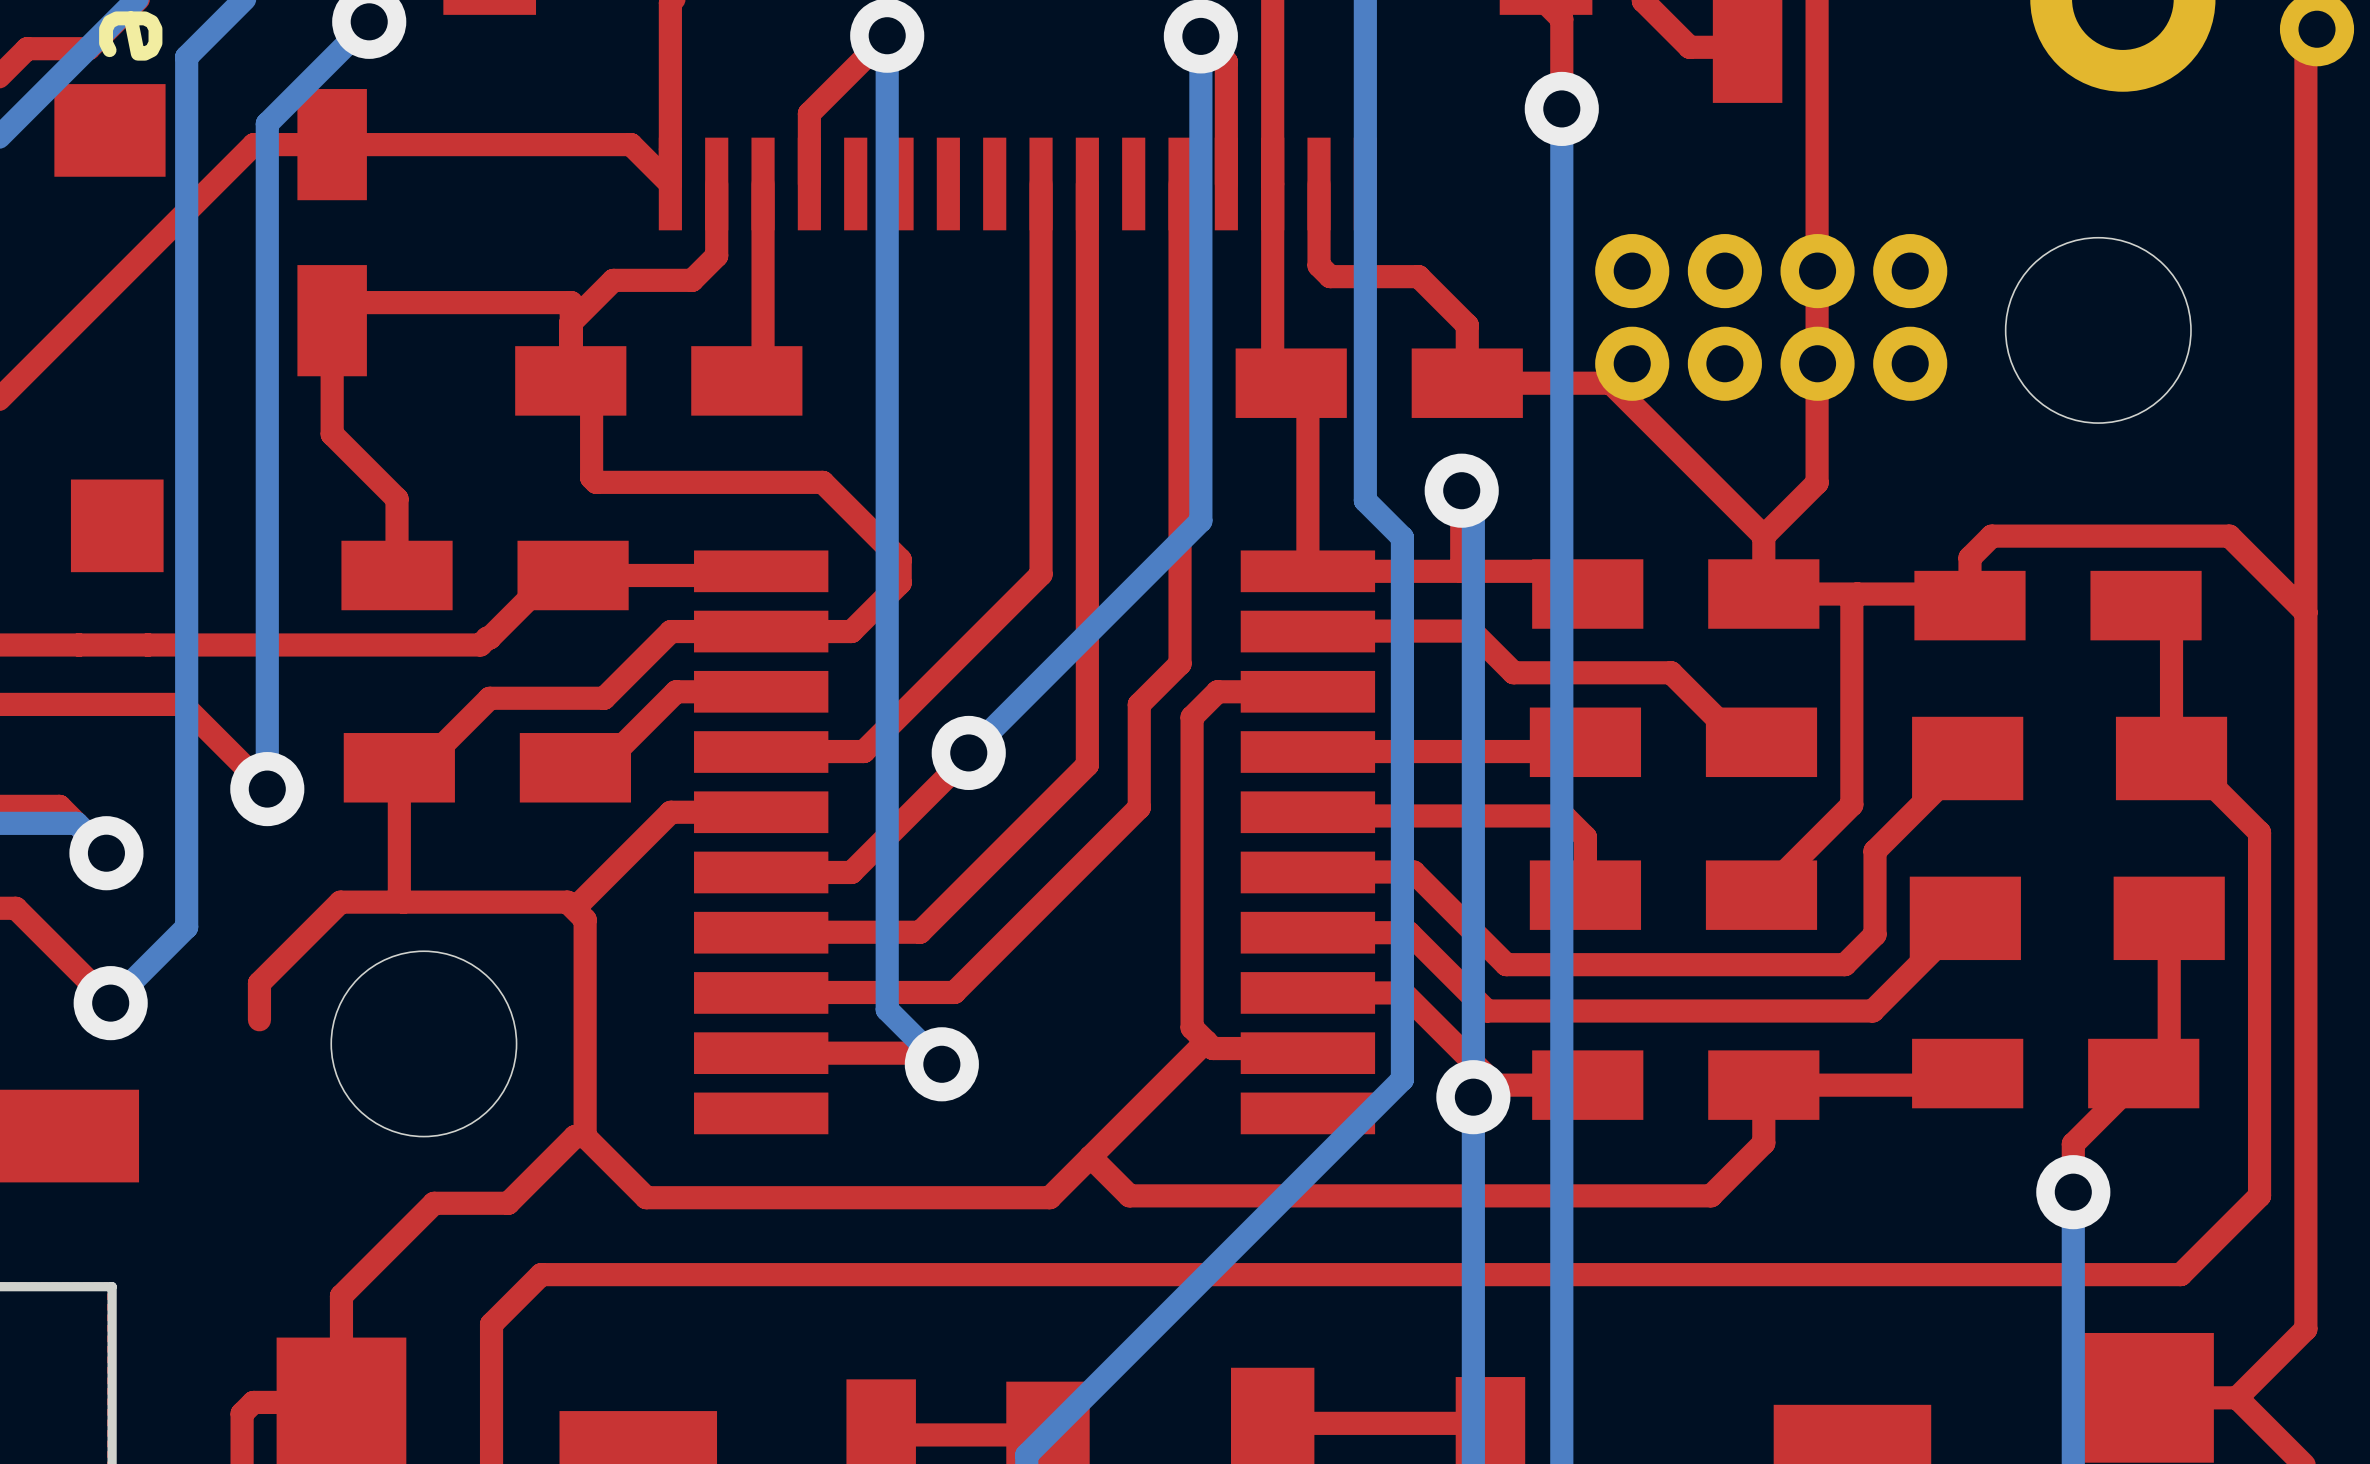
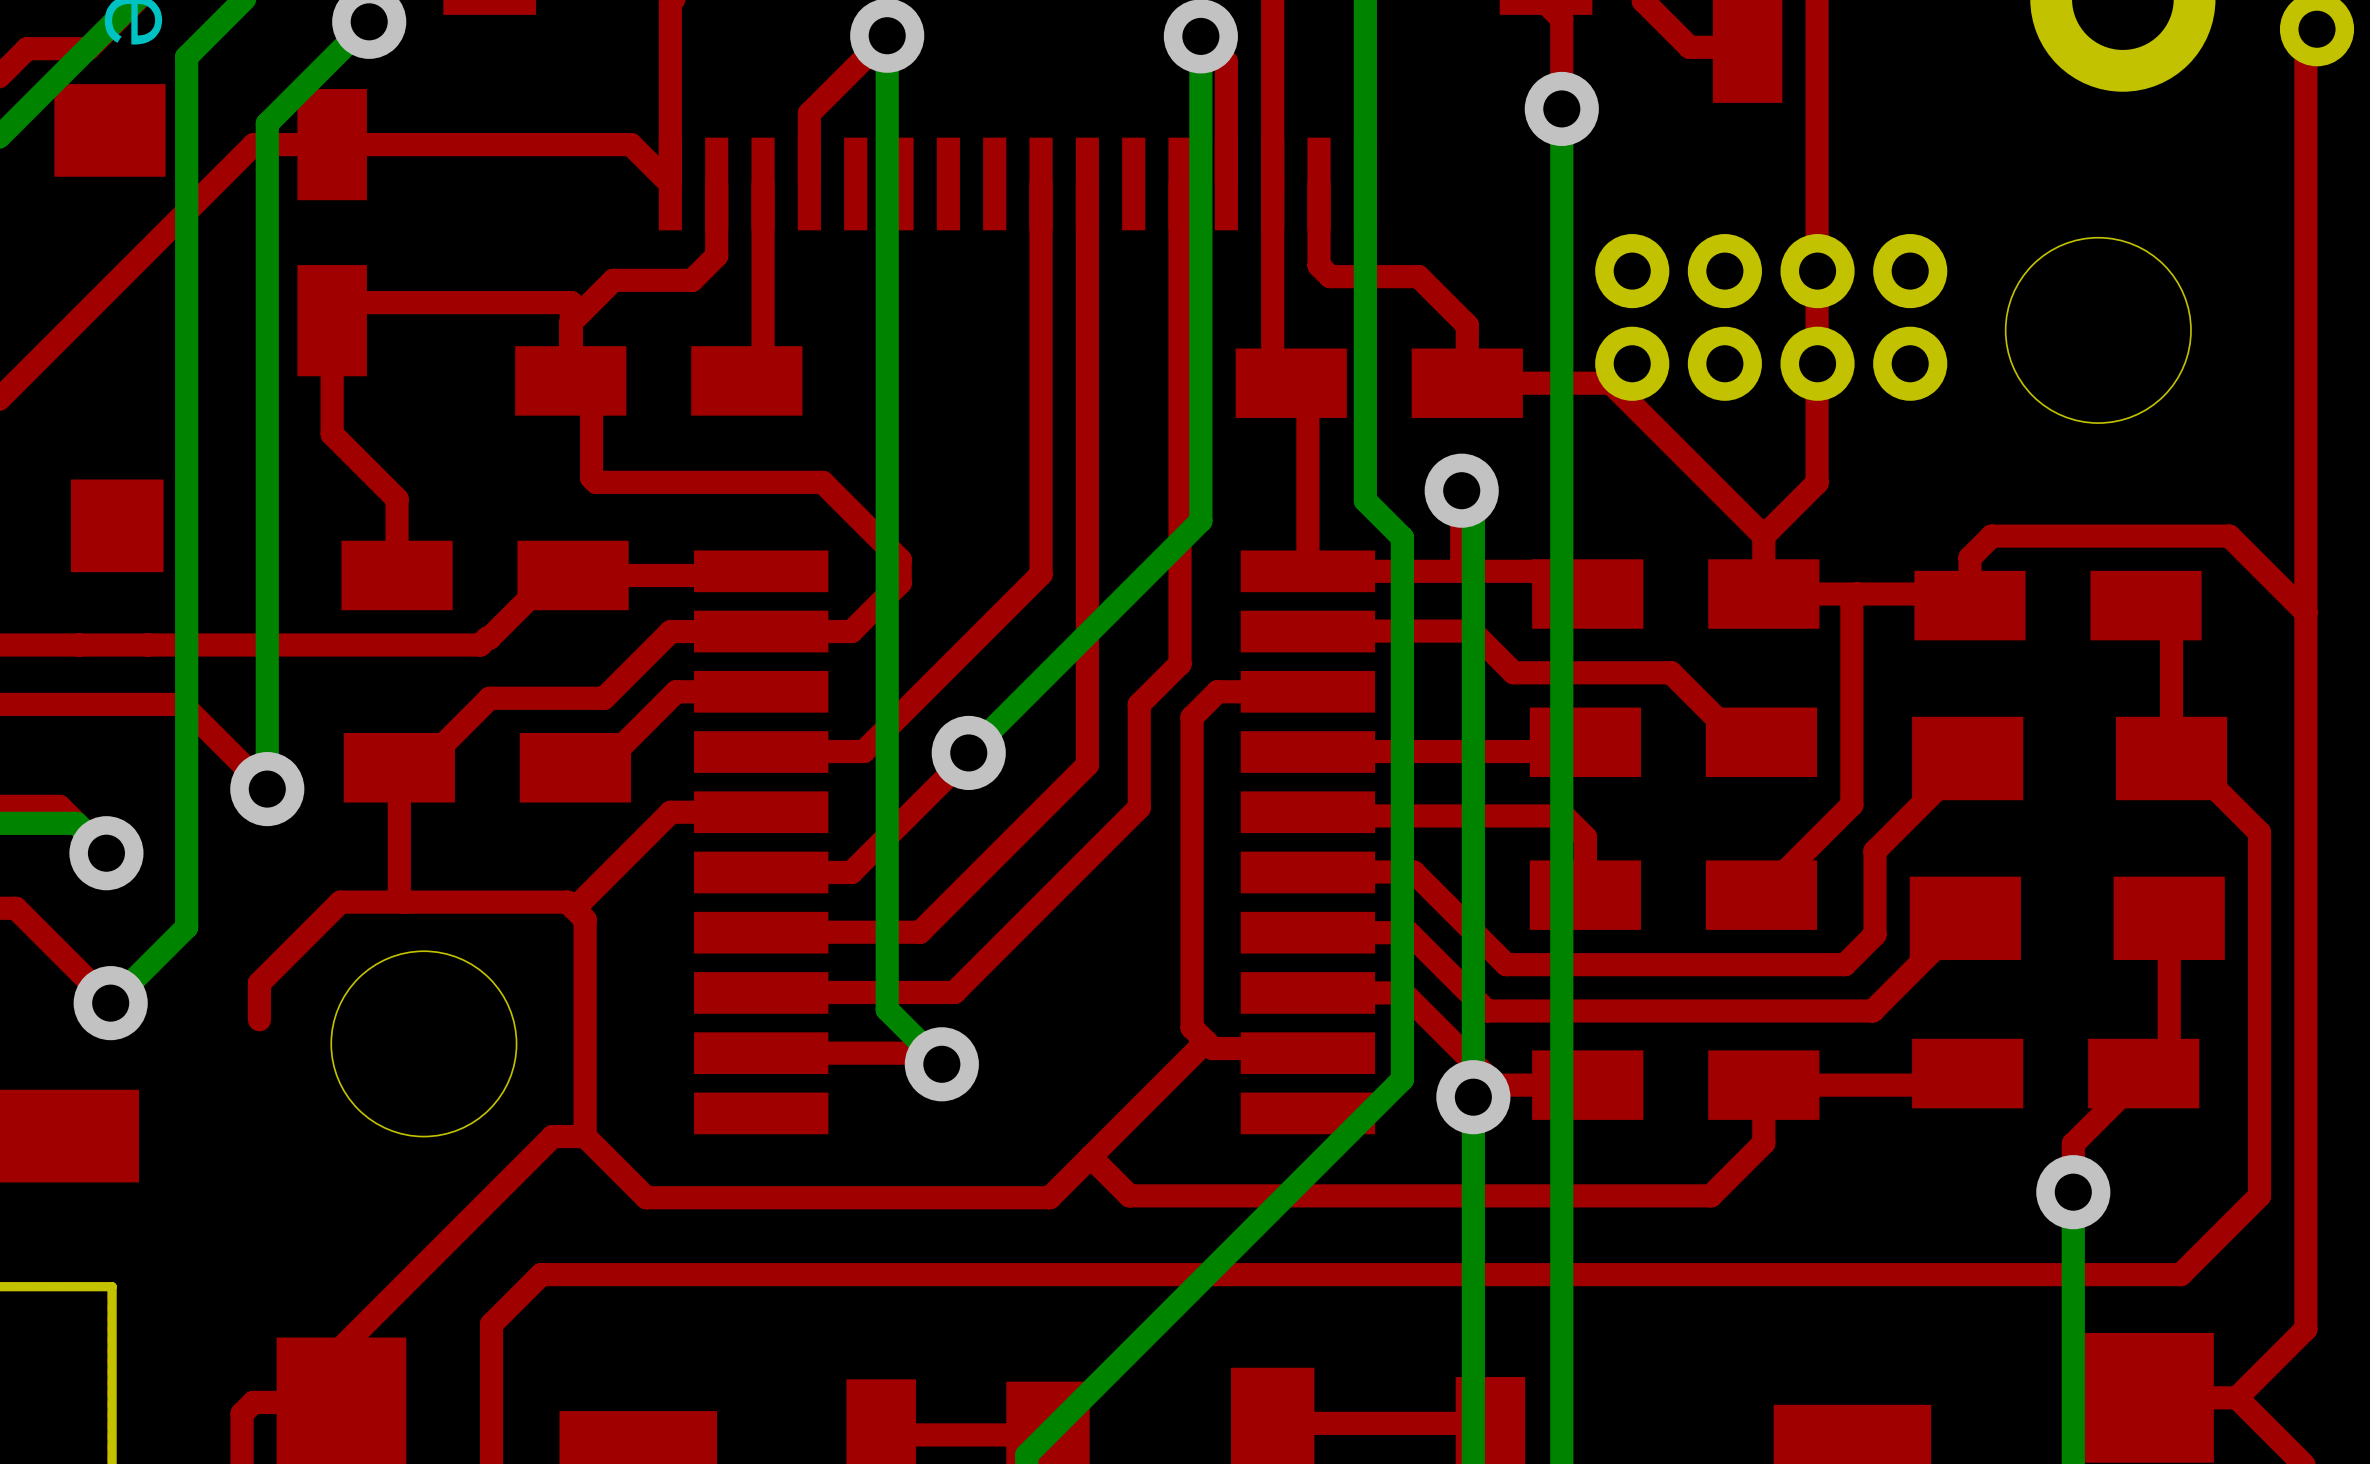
top track: (574, 1136) (508, 1203) (434, 1203) (341, 1295) (341, 1347) -> (574, 1136) (552, 1136) (341, 1347)

